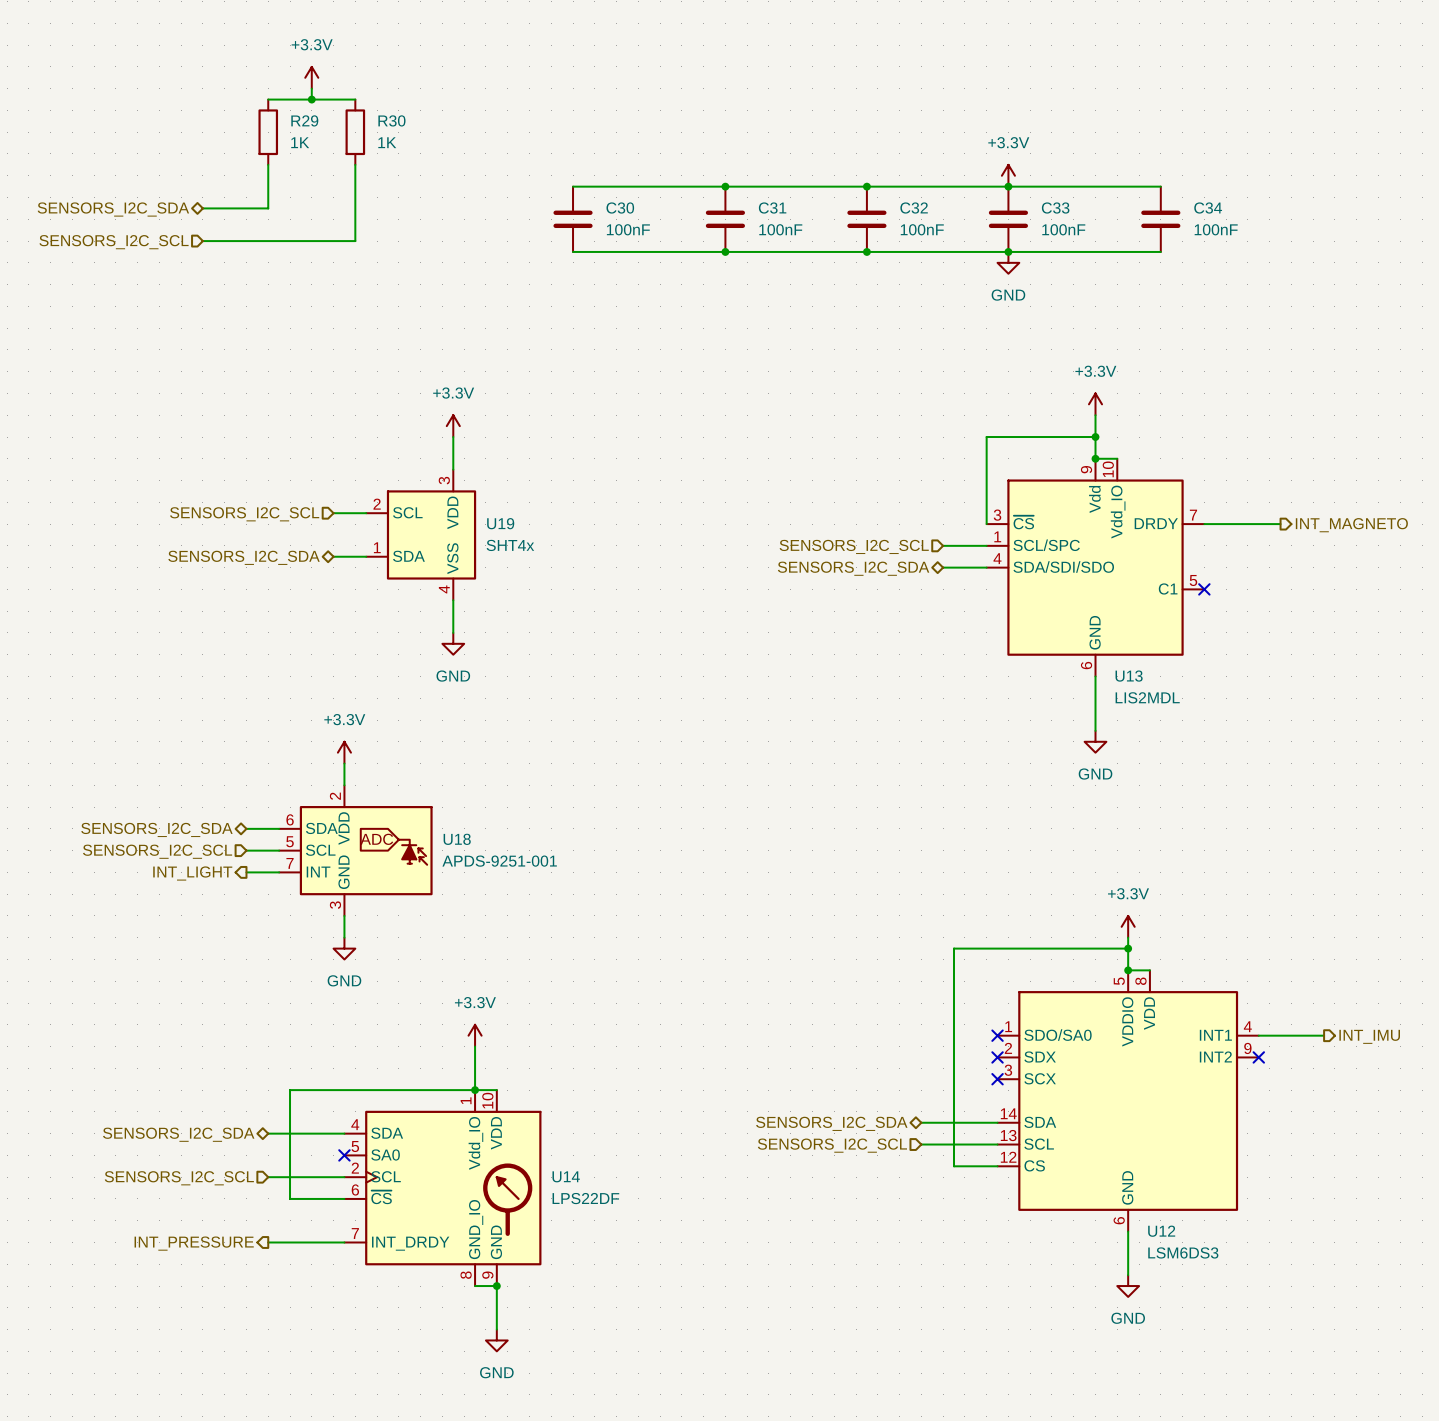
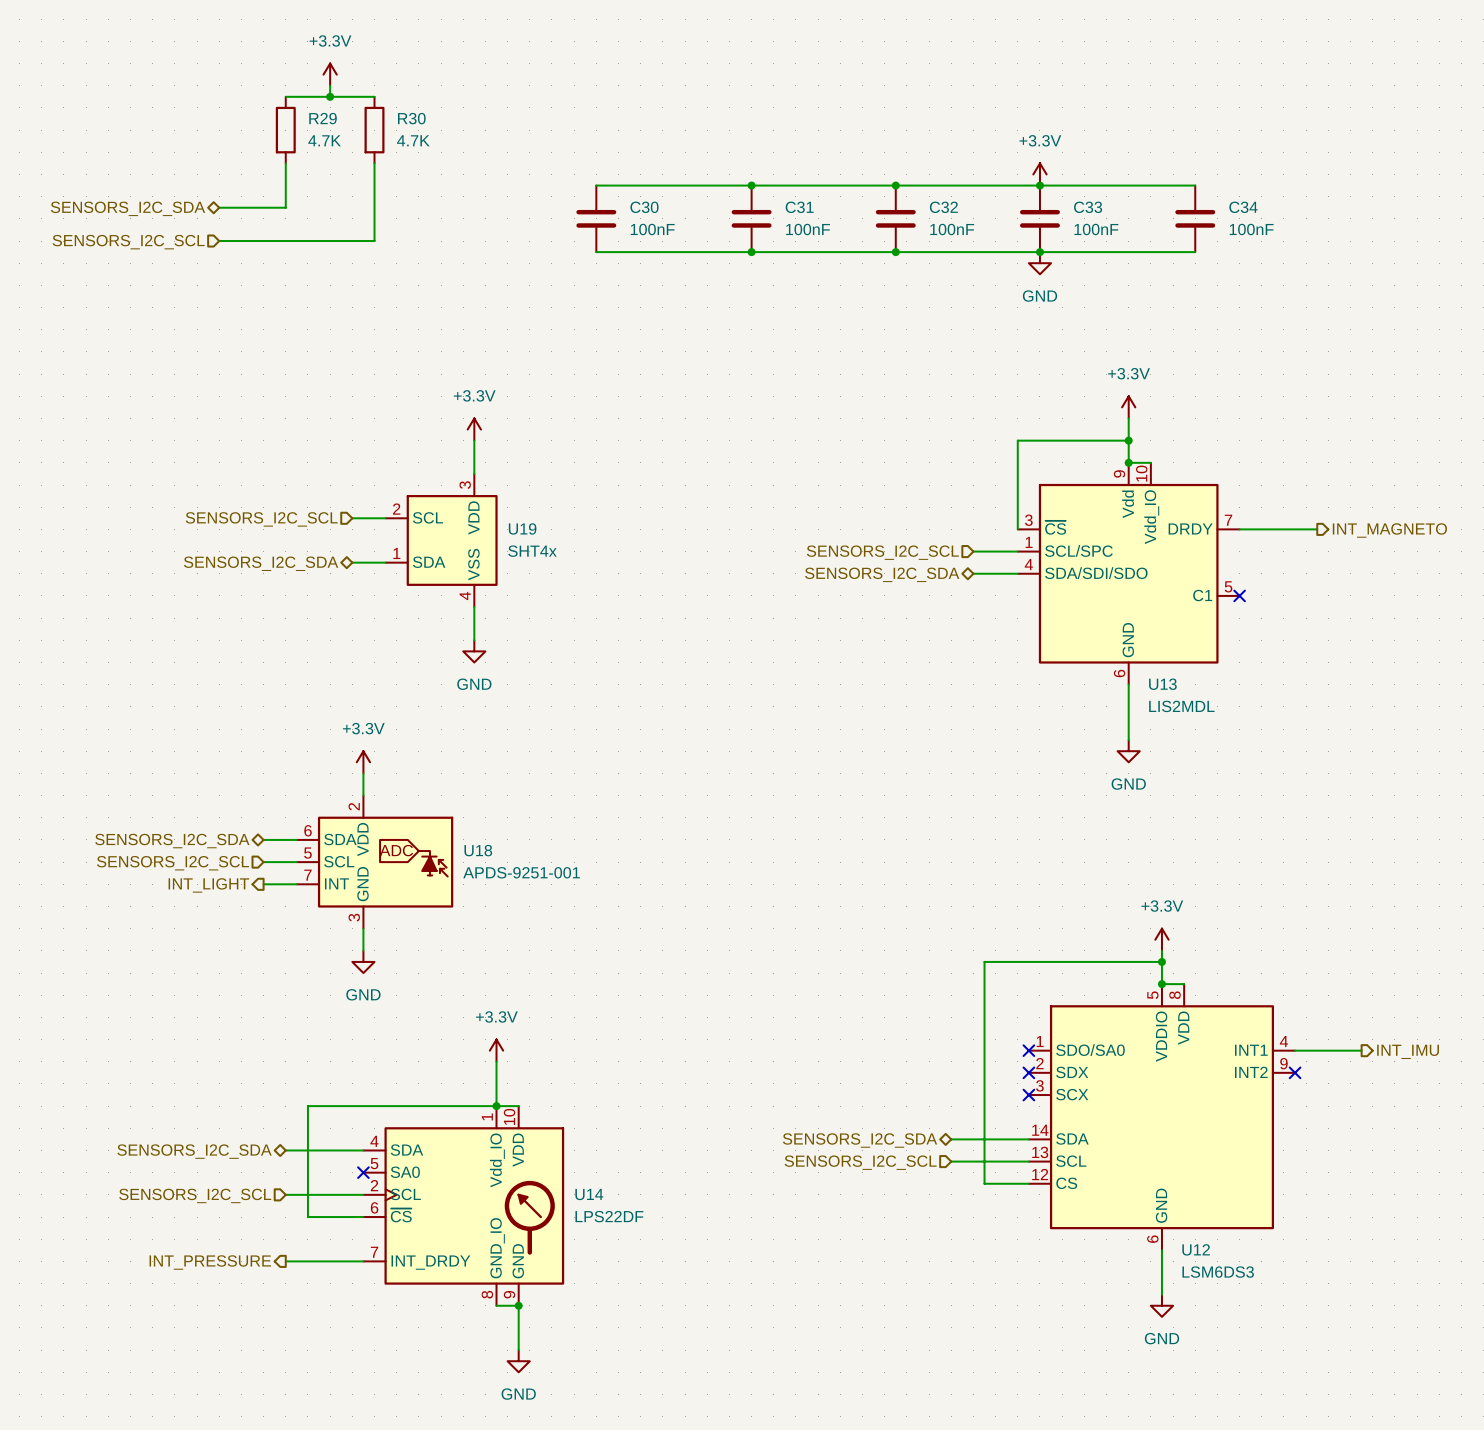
R29 value: 1K (300, 142) -> 4.7K (324, 140)
R30 value: 1K (387, 142) -> 4.7K (413, 140)

